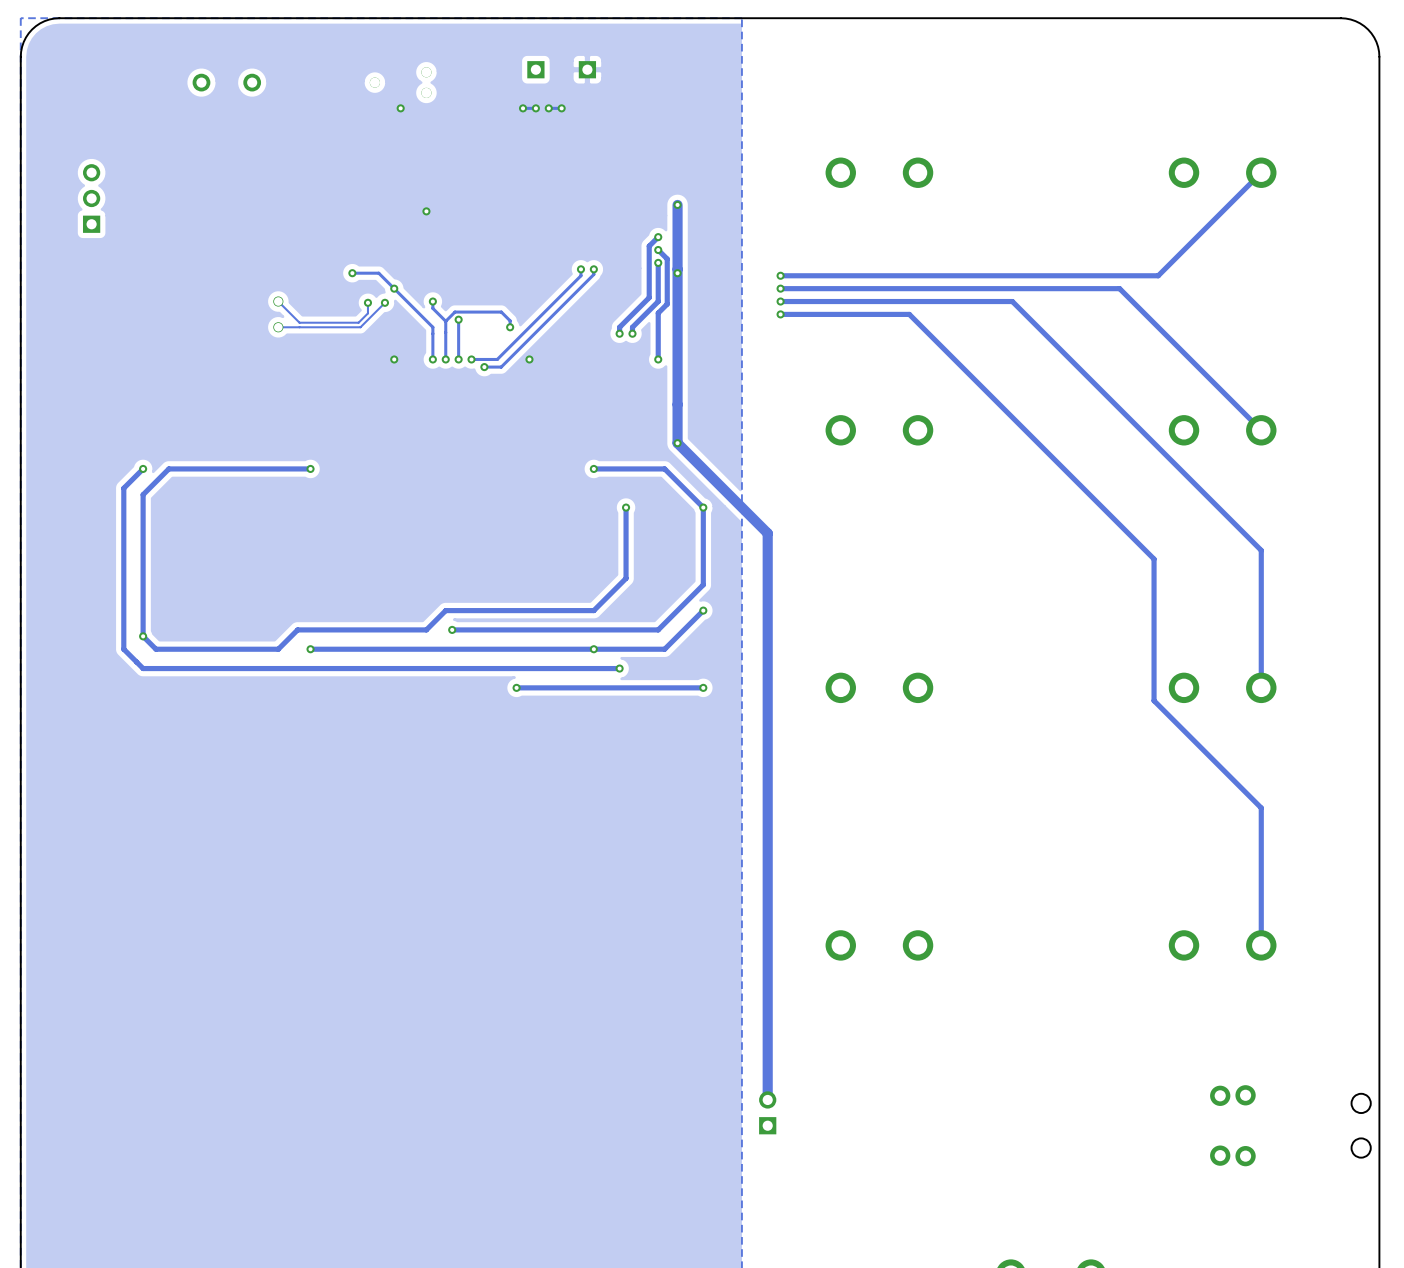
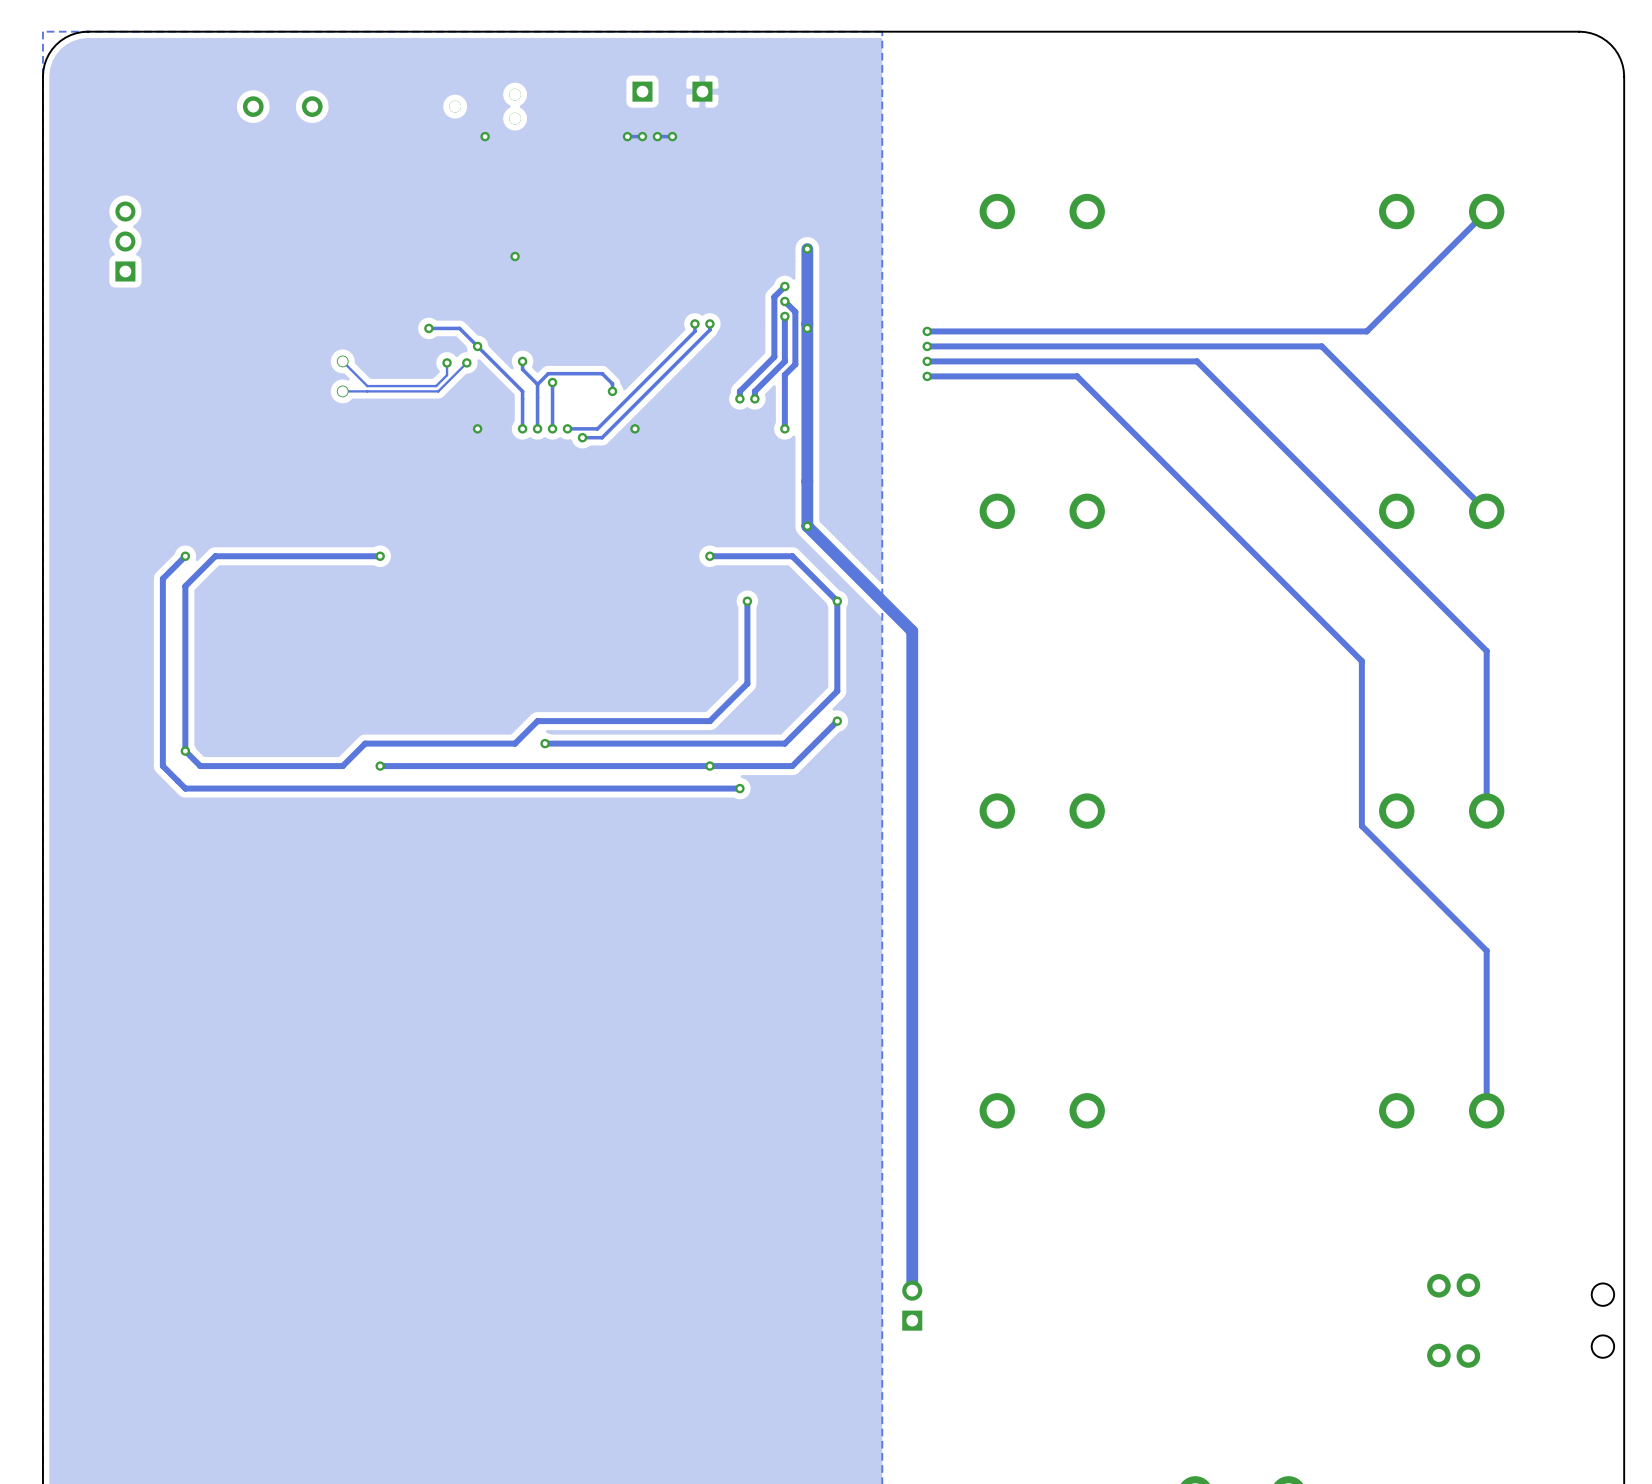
via: (516, 687) -> none
track: (703, 687) (516, 687) -> none
via: (703, 687) -> none

